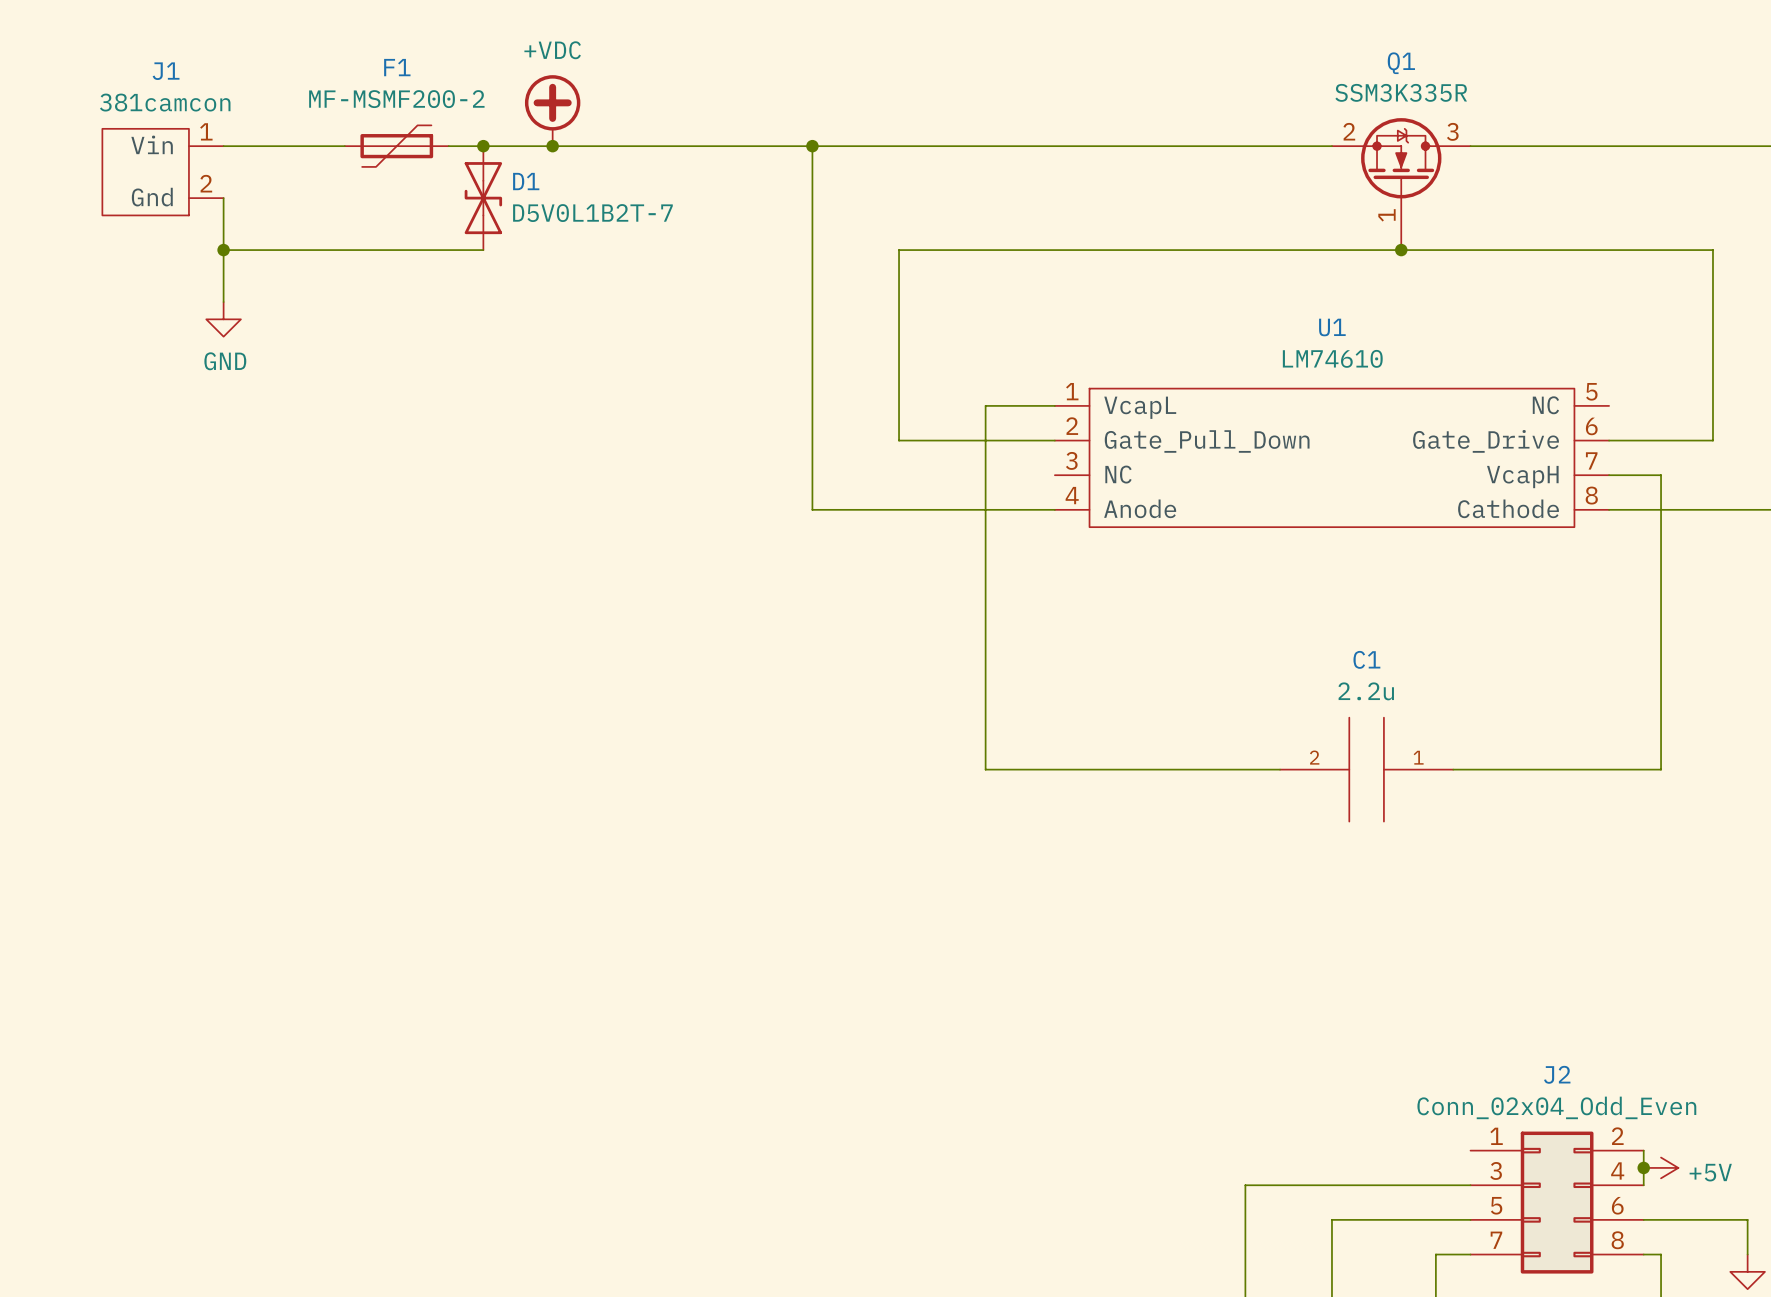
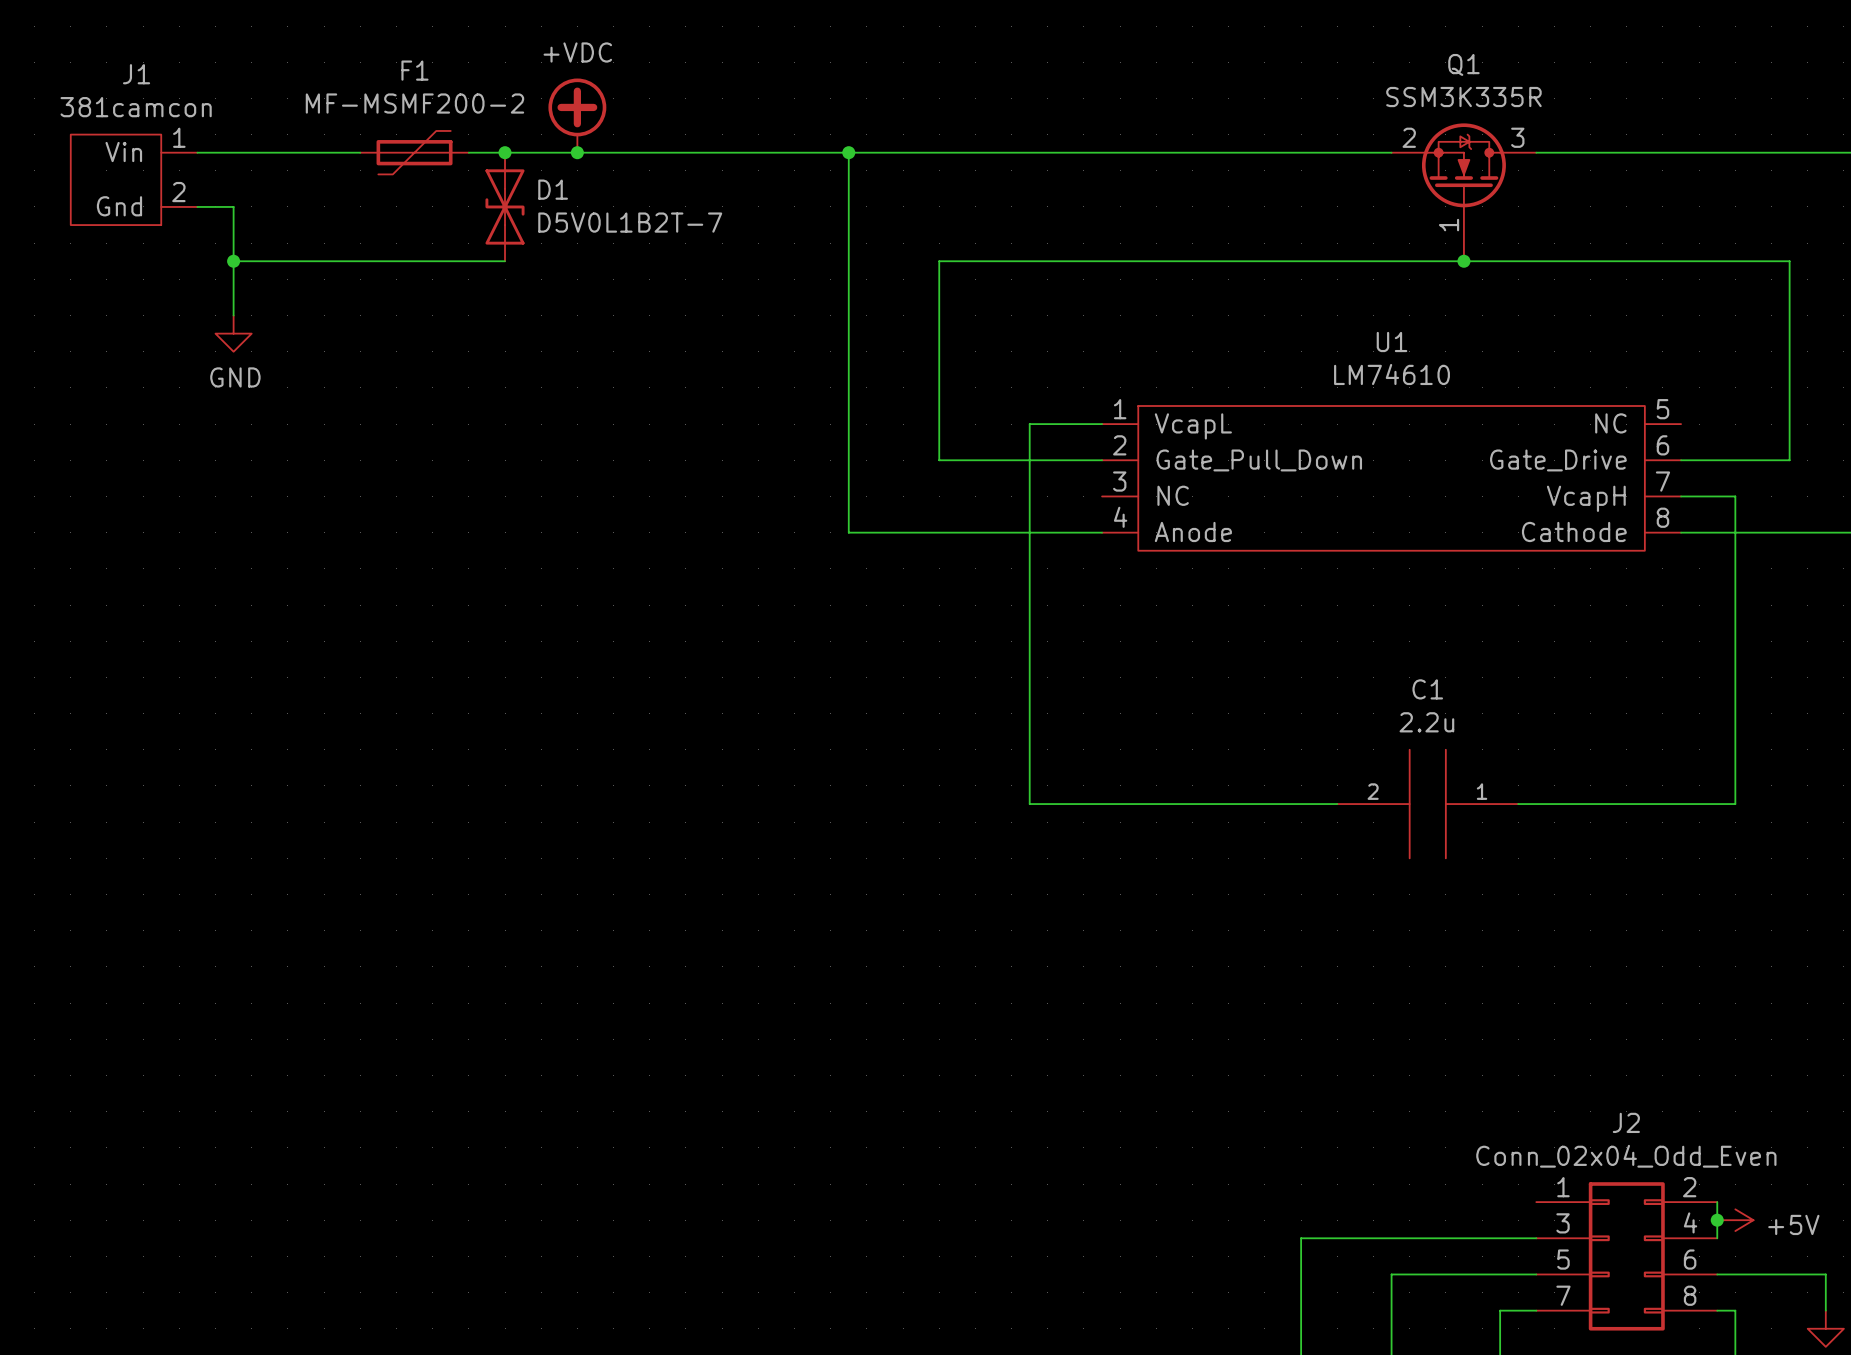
J1 position: (162, 172) -> (134, 179)

